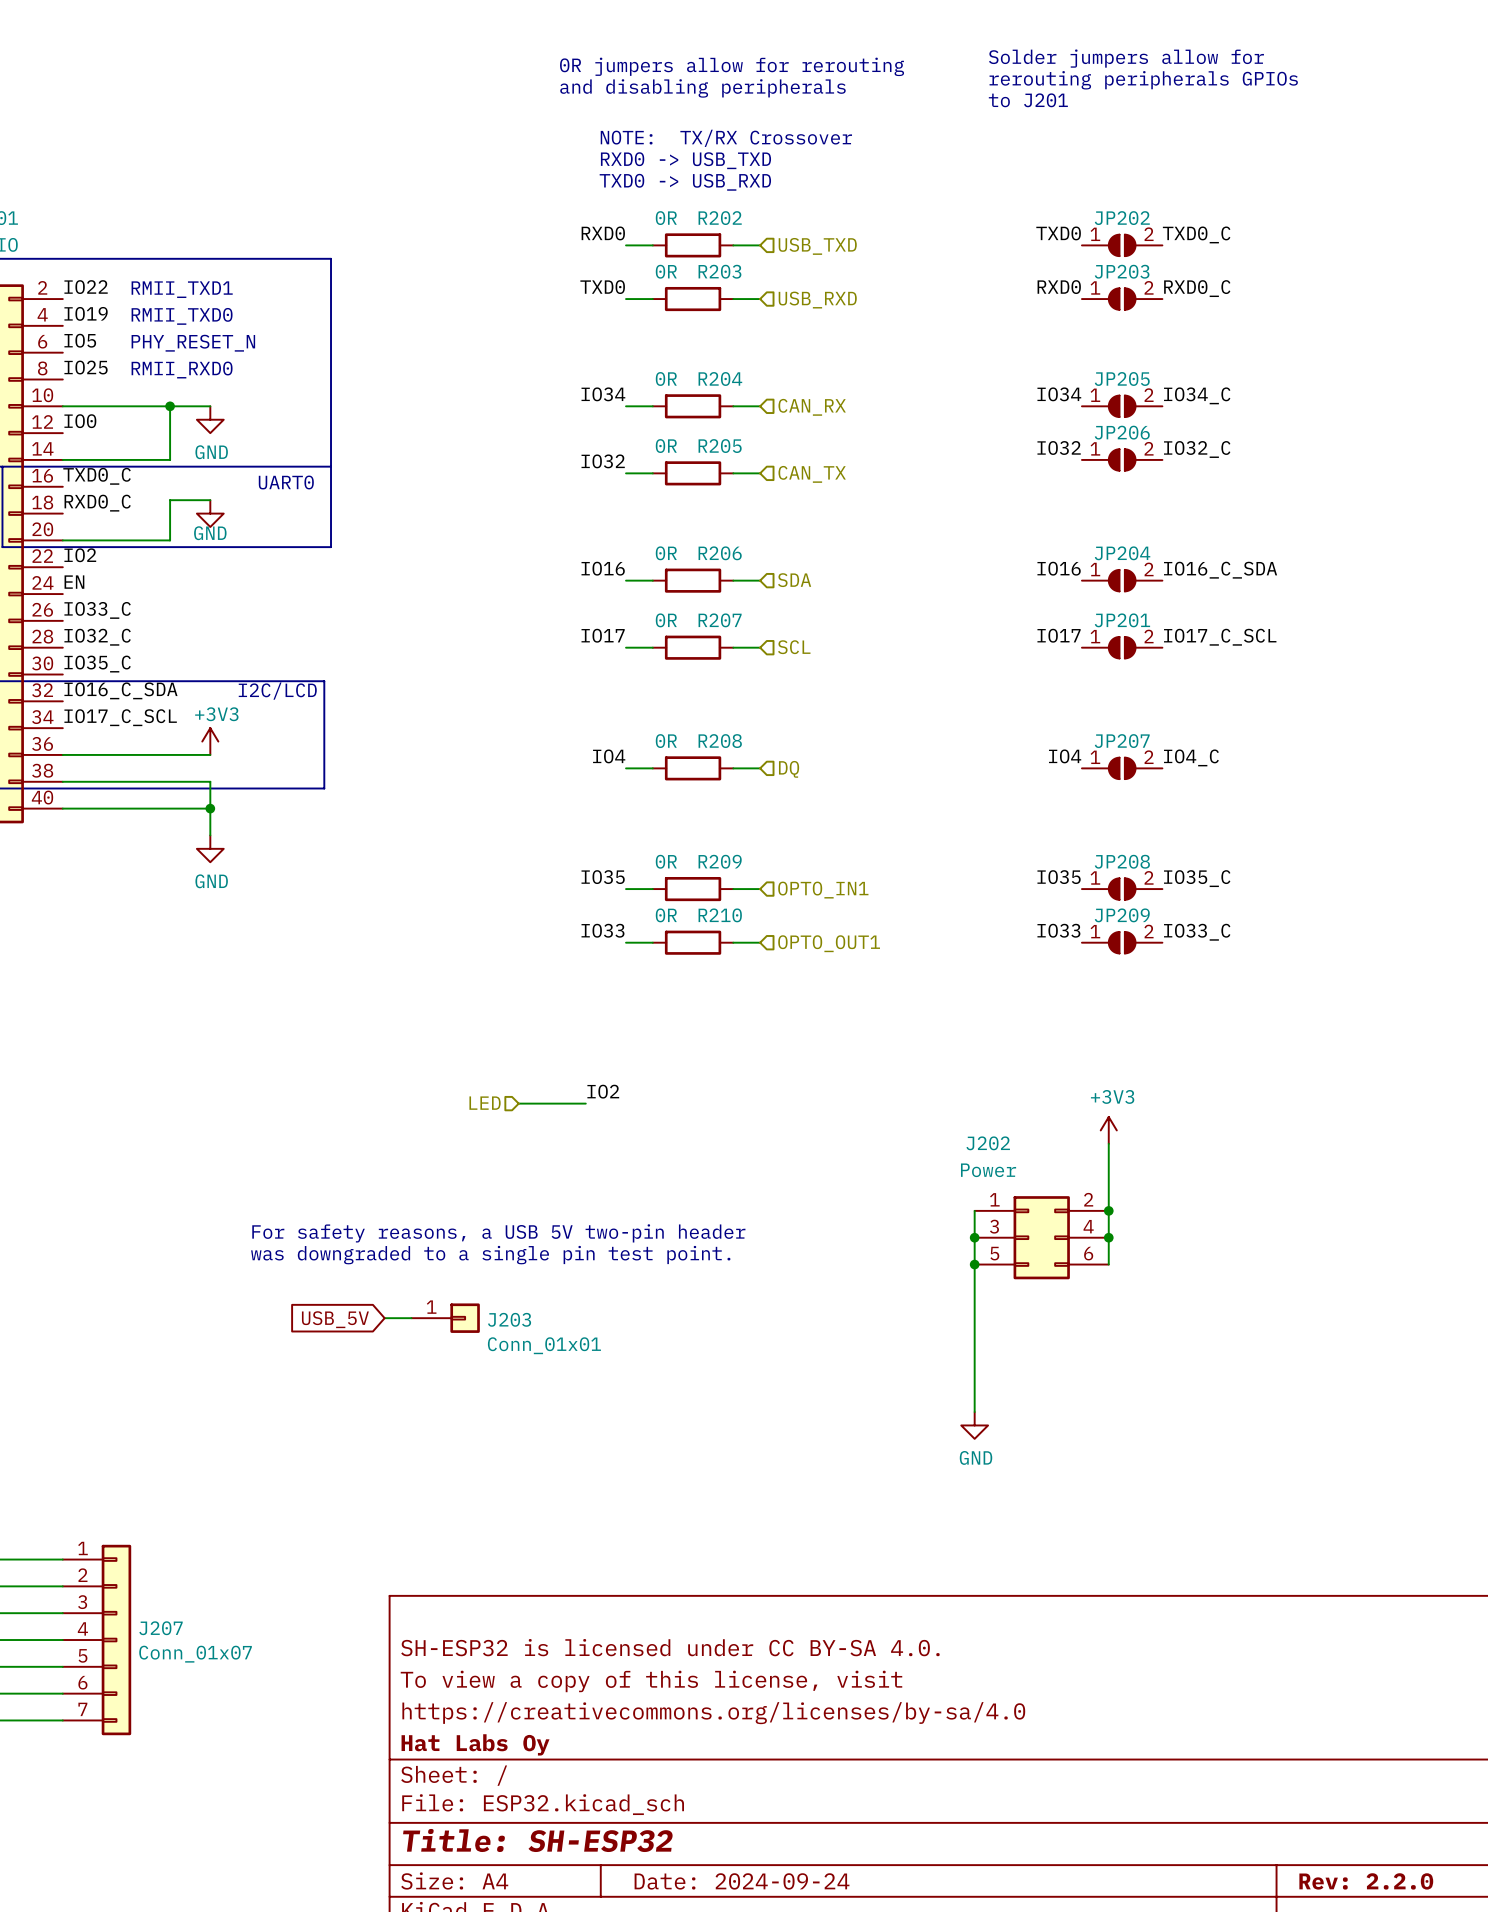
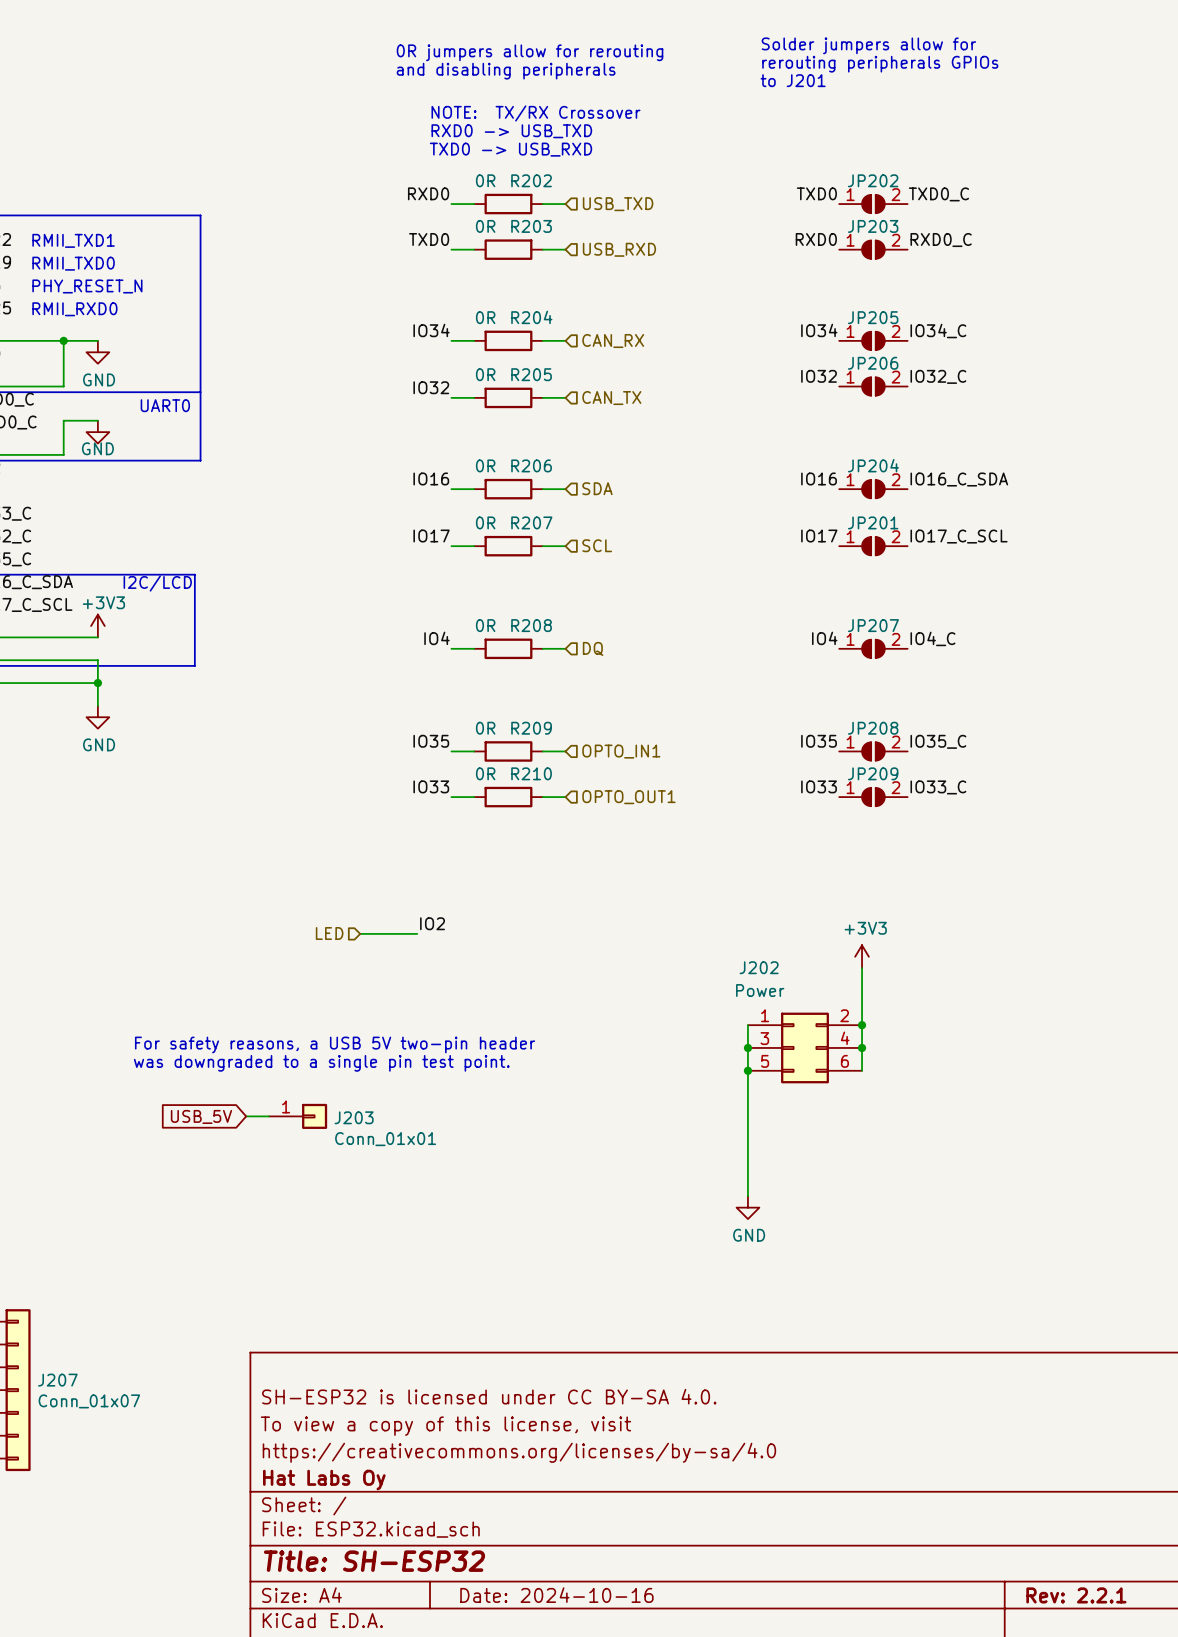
title block: Date: 2024-09-24 (742, 1881) -> Date: 2024-10-16 (556, 1595)
title block: Rev: 2.2.0 (1366, 1881) -> Rev: 2.2.1 (1076, 1595)

